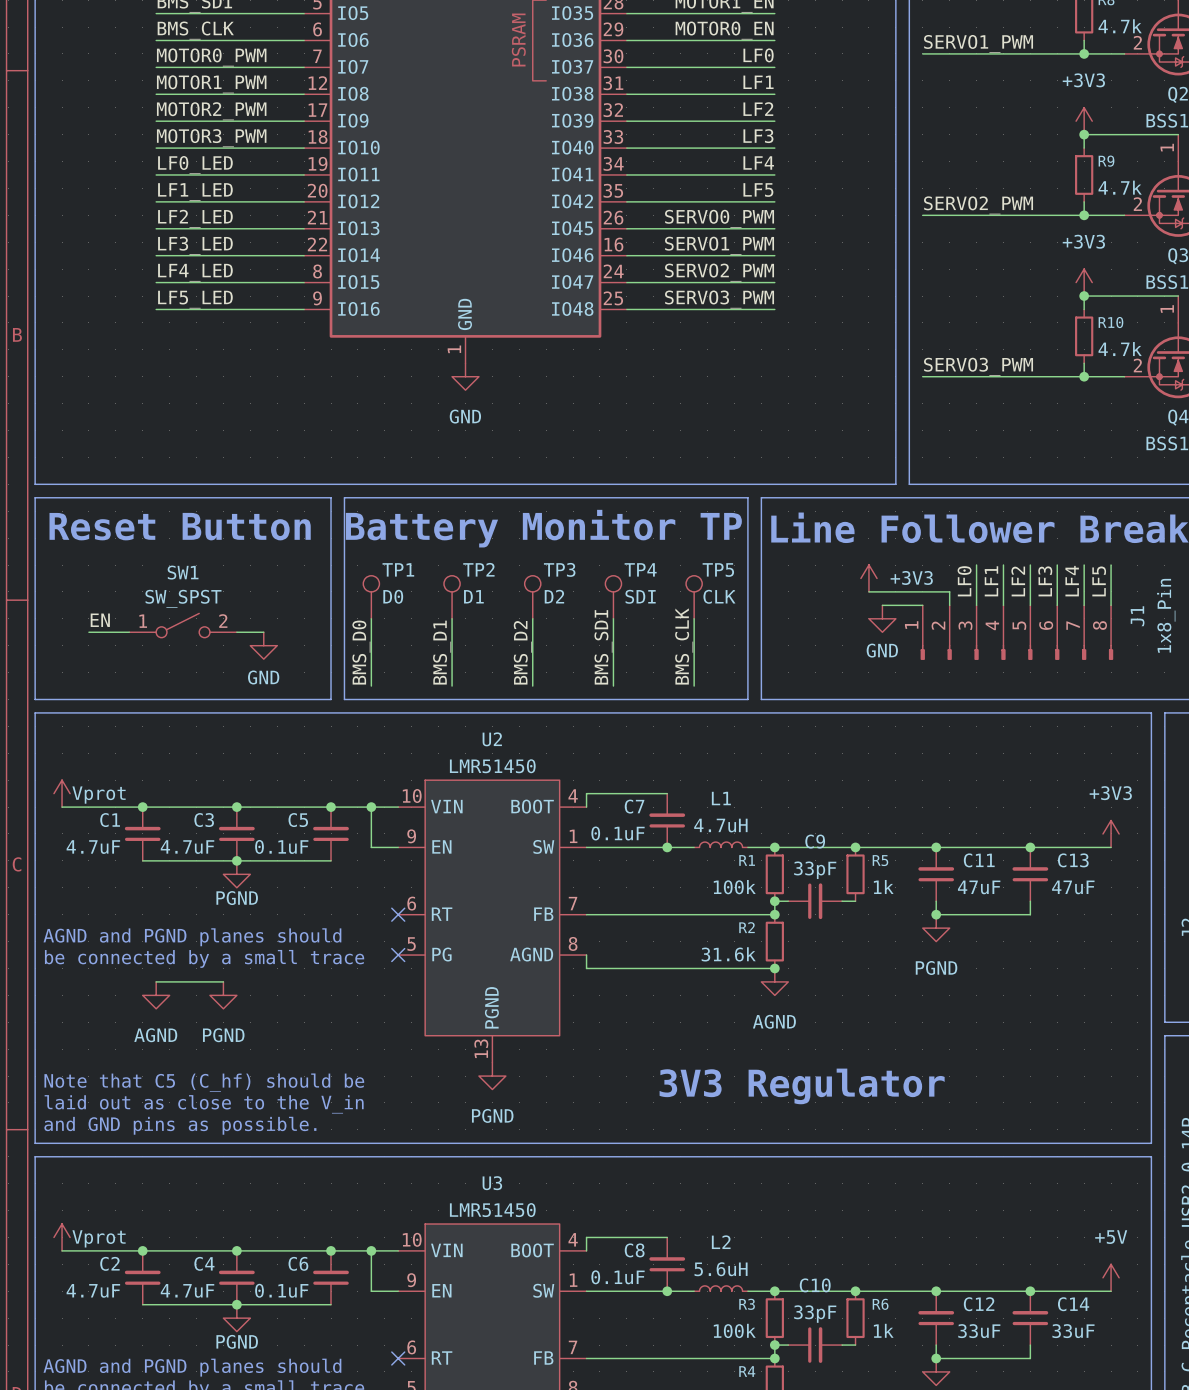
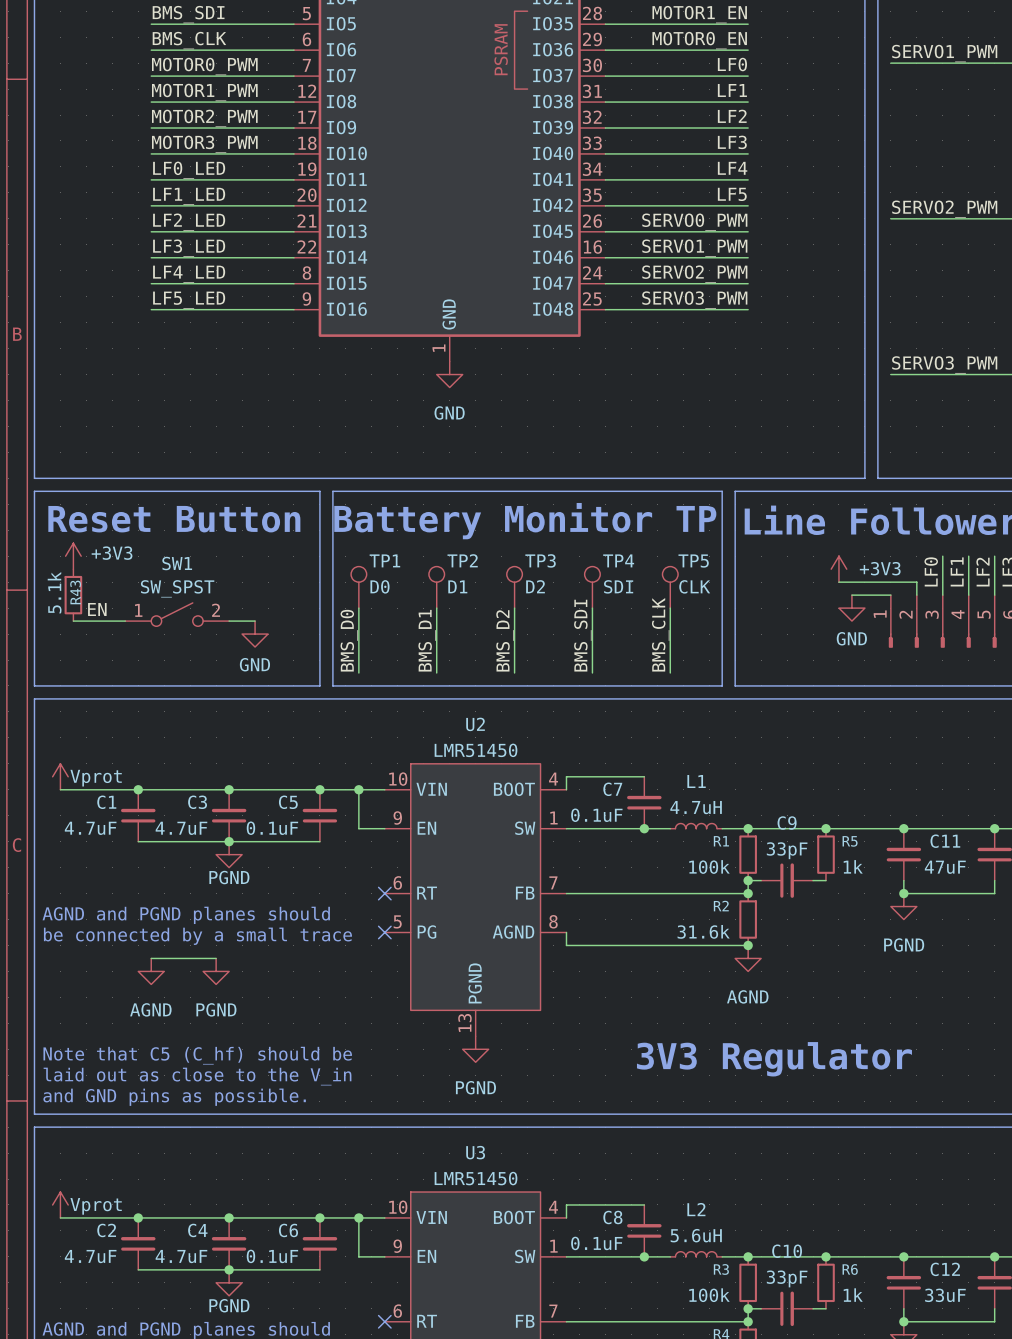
power symbol: none -> +3V3 (73, 556)
R43: none -> 5.1k (73, 595)
wire: none -> (73, 621) (86, 621)

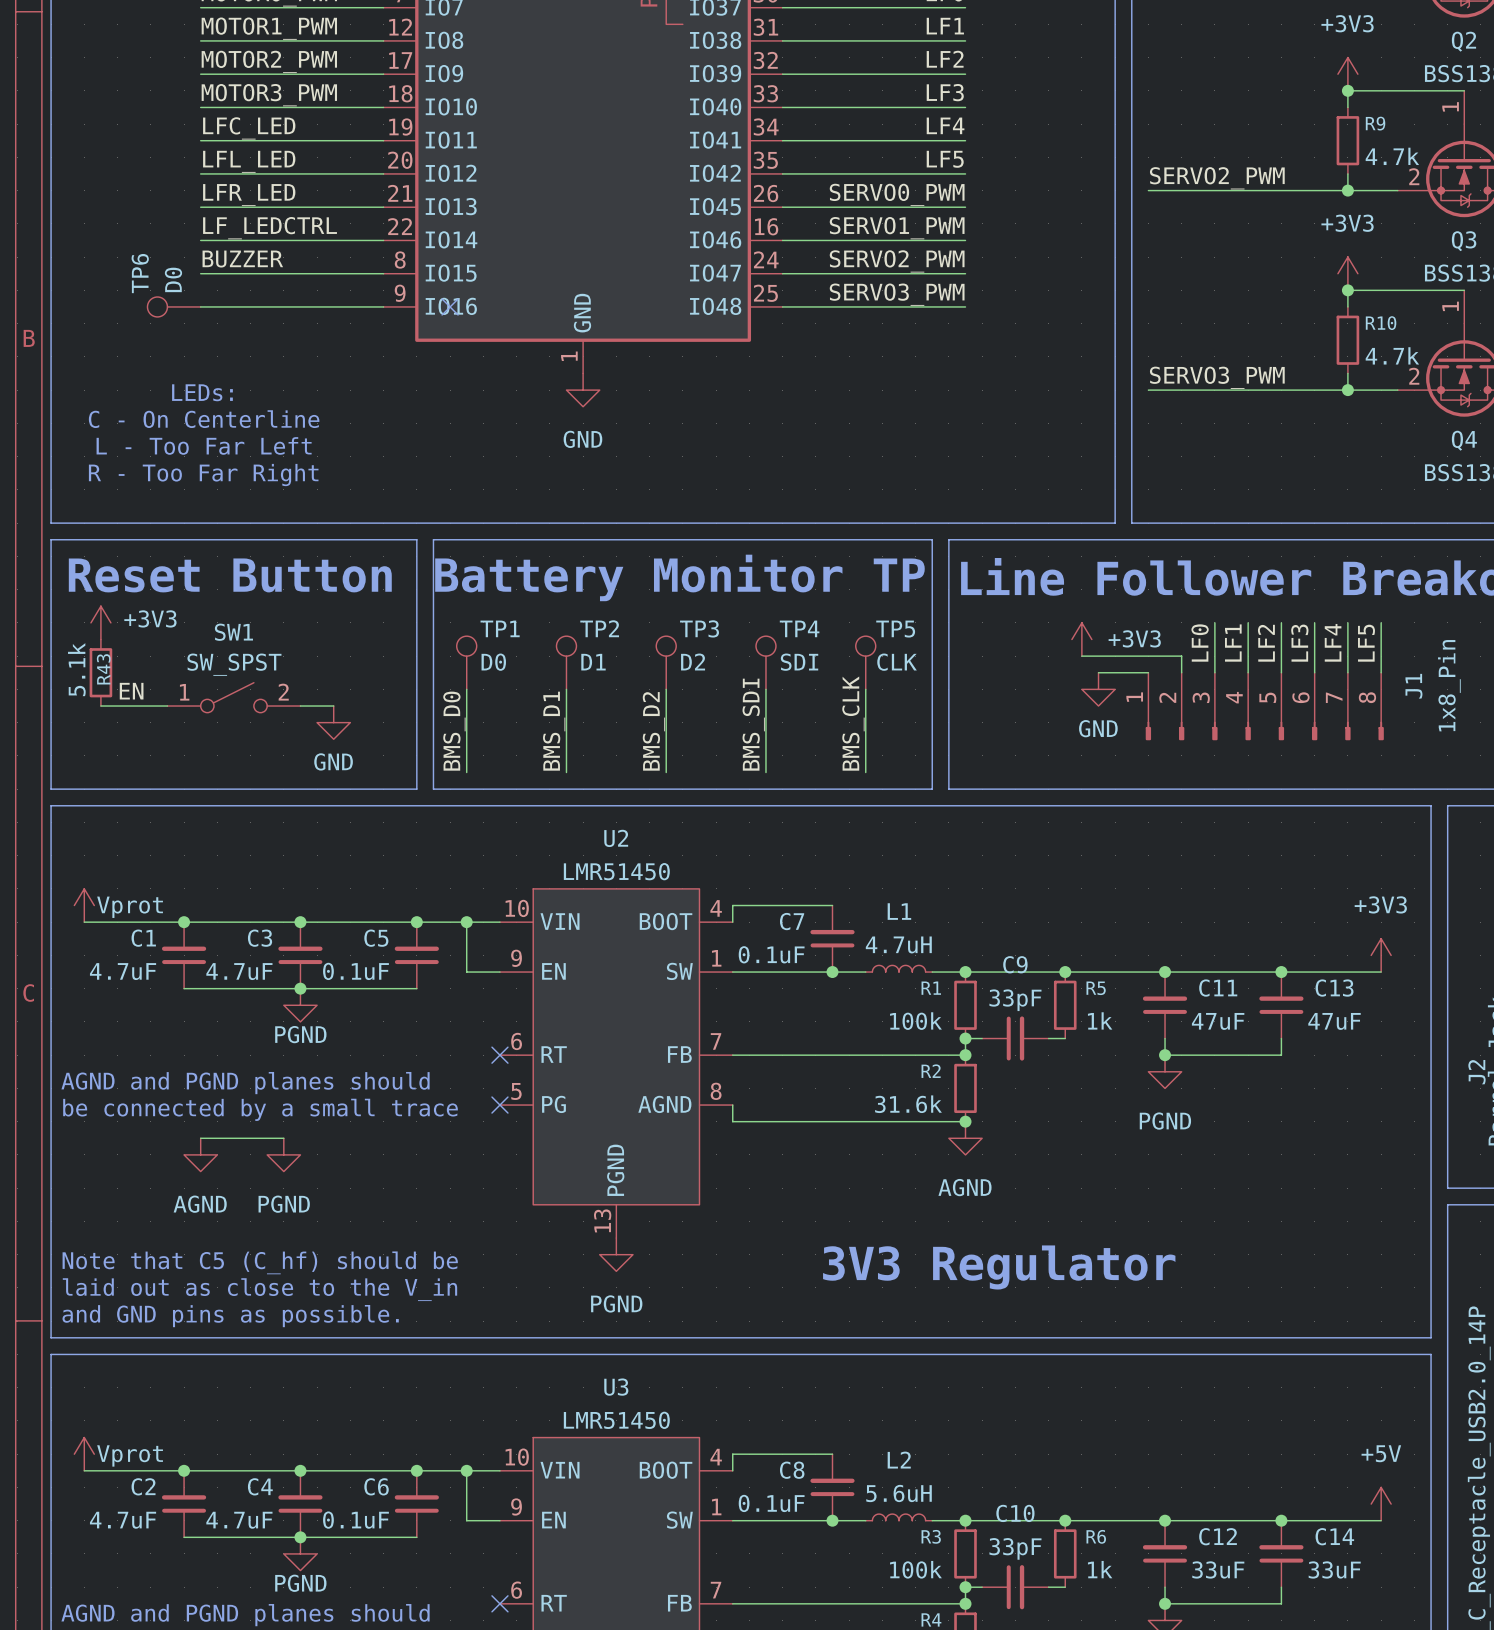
label: LF0_LED (189, 170) -> LFC_LED (249, 128)
label: LF1_LED (189, 196) -> LFL_LED (249, 161)
label: LF2_LED (189, 222) -> LFR_LED (249, 195)
label: LF3_LED (189, 248) -> LF_LEDCTRL (270, 228)
label: LF4_LED (189, 274) -> BUZZER (242, 259)
label: LF5_LED (189, 300) -> none
TP6: none -> D0 (174, 306)
no-connect mark: none -> (450, 306)
text: none -> LEDs: (202, 392)
text: none -> C - On Centerline (204, 419)
text: none -> L - Too Far Left (204, 445)
text: none -> R - Too Far Right (203, 475)

